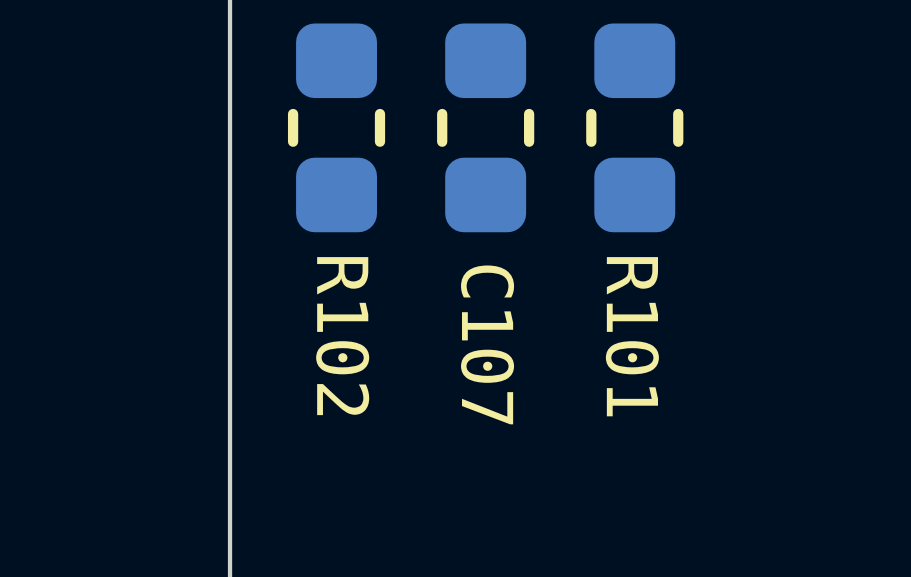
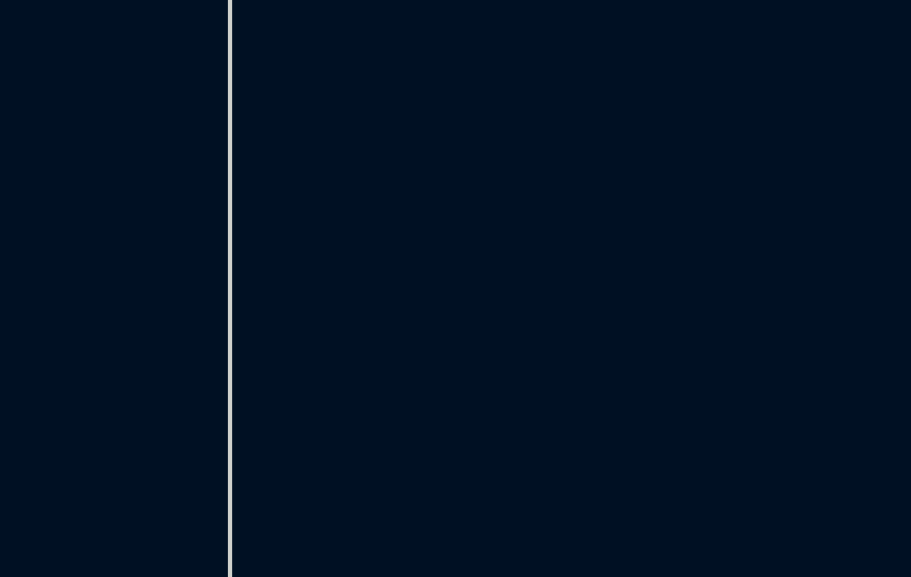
R102: (336, 127) -> none
C107: (485, 127) -> none
R101: (634, 127) -> none

